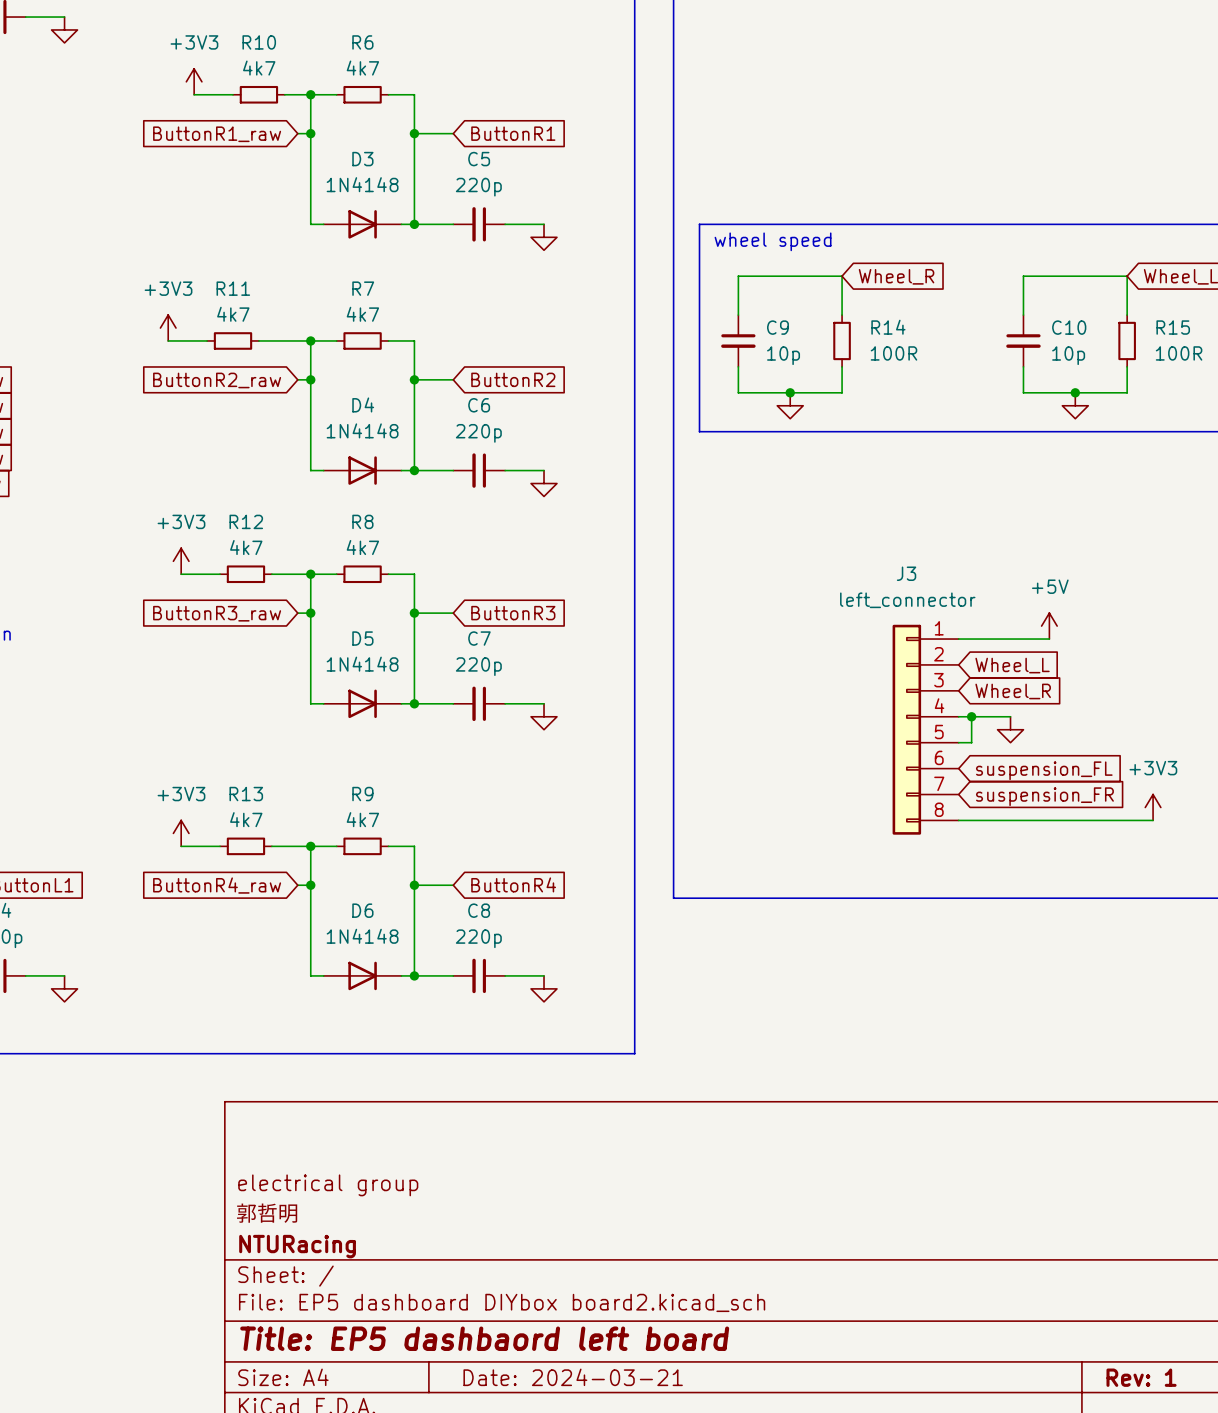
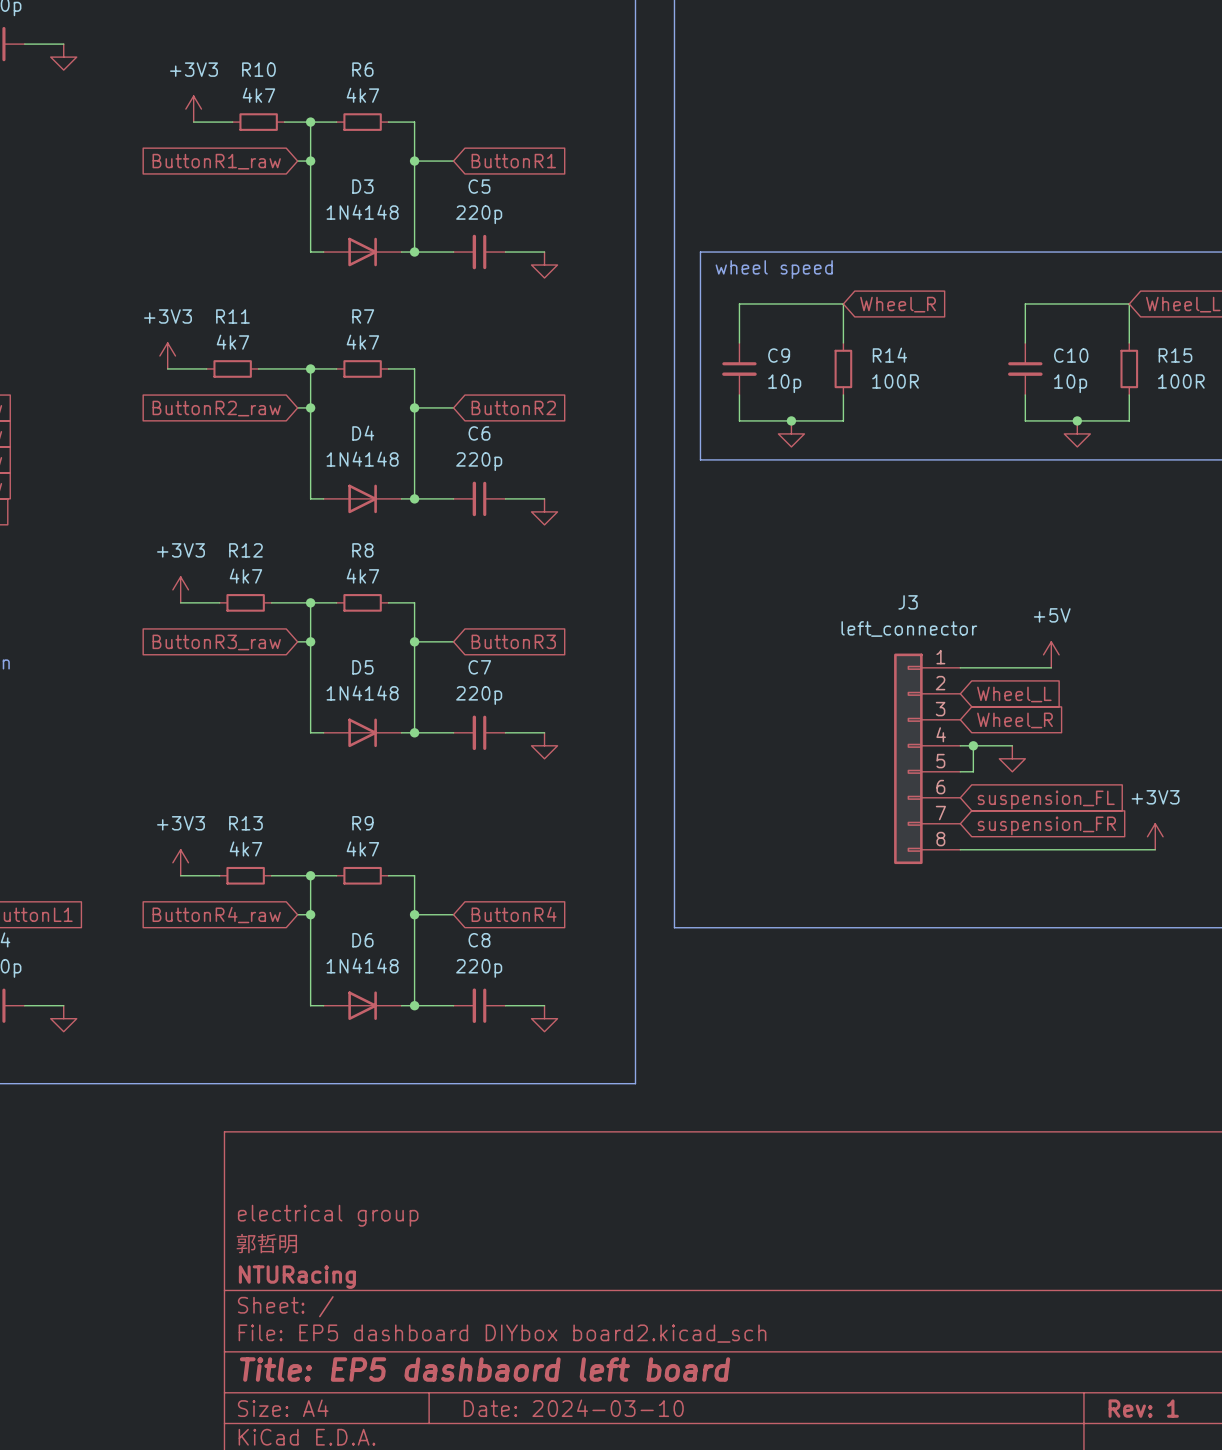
title block: Date: 2024-03-21 (573, 1377) -> Date: 2024-03-10 (573, 1408)

